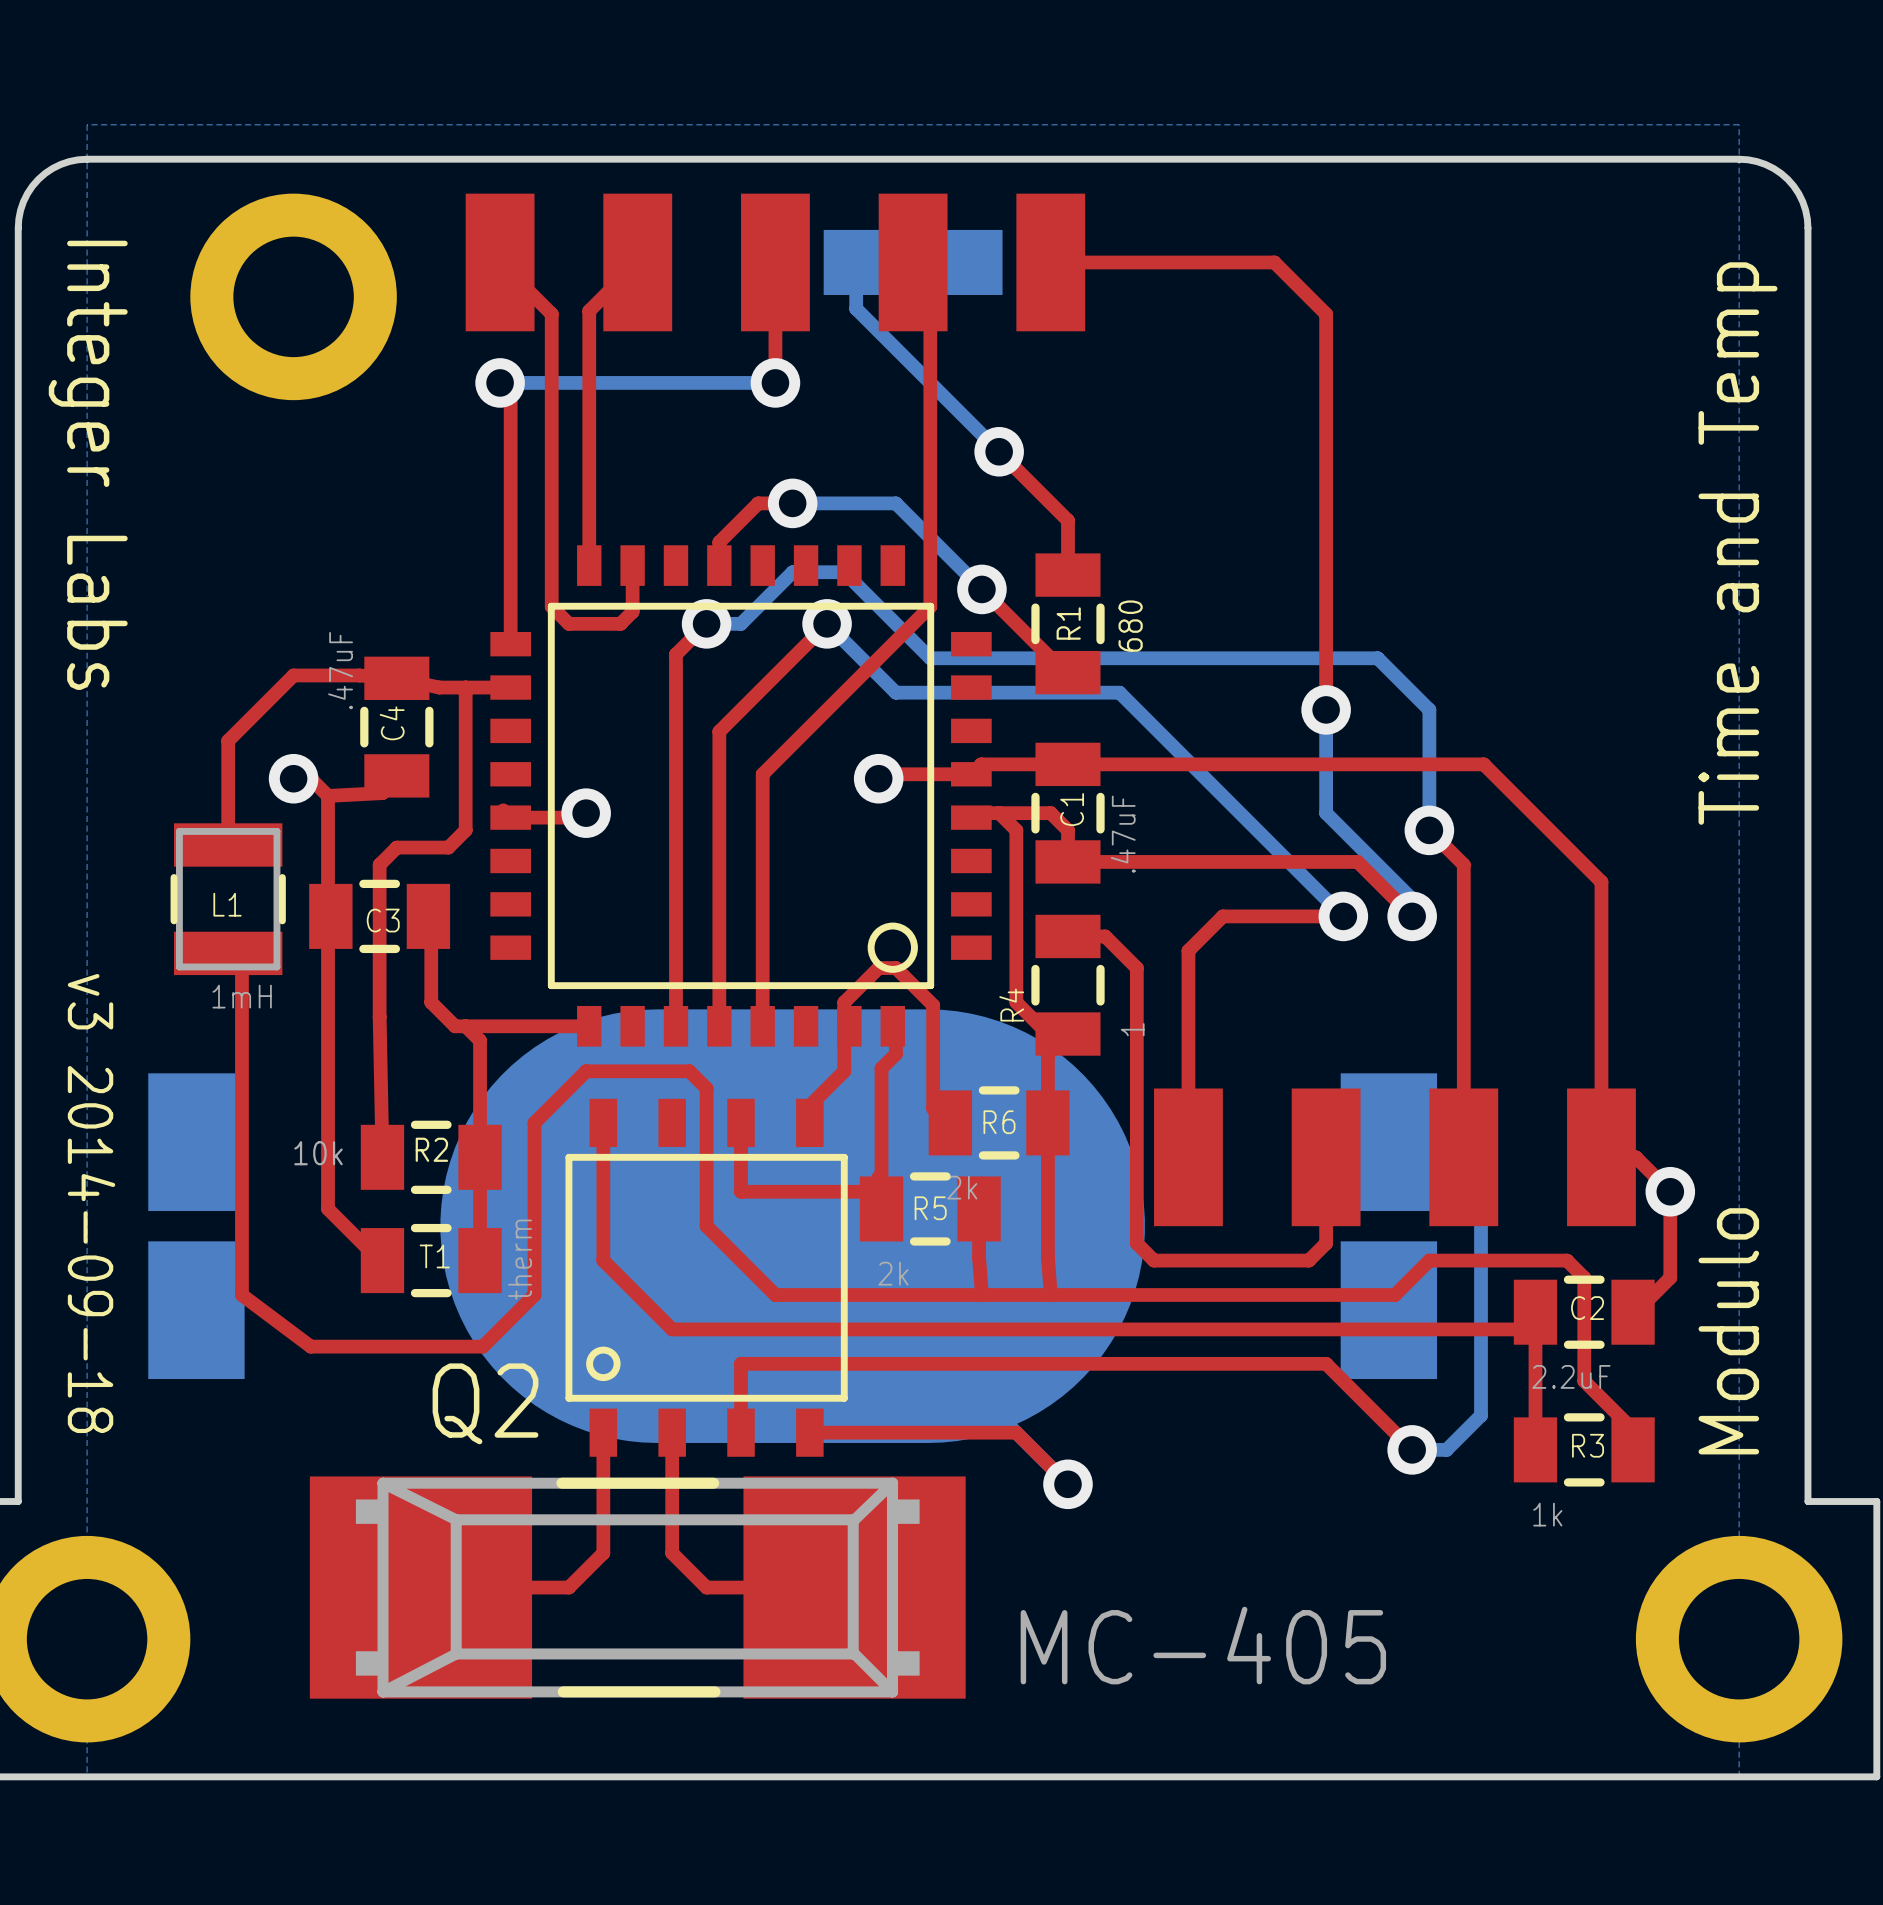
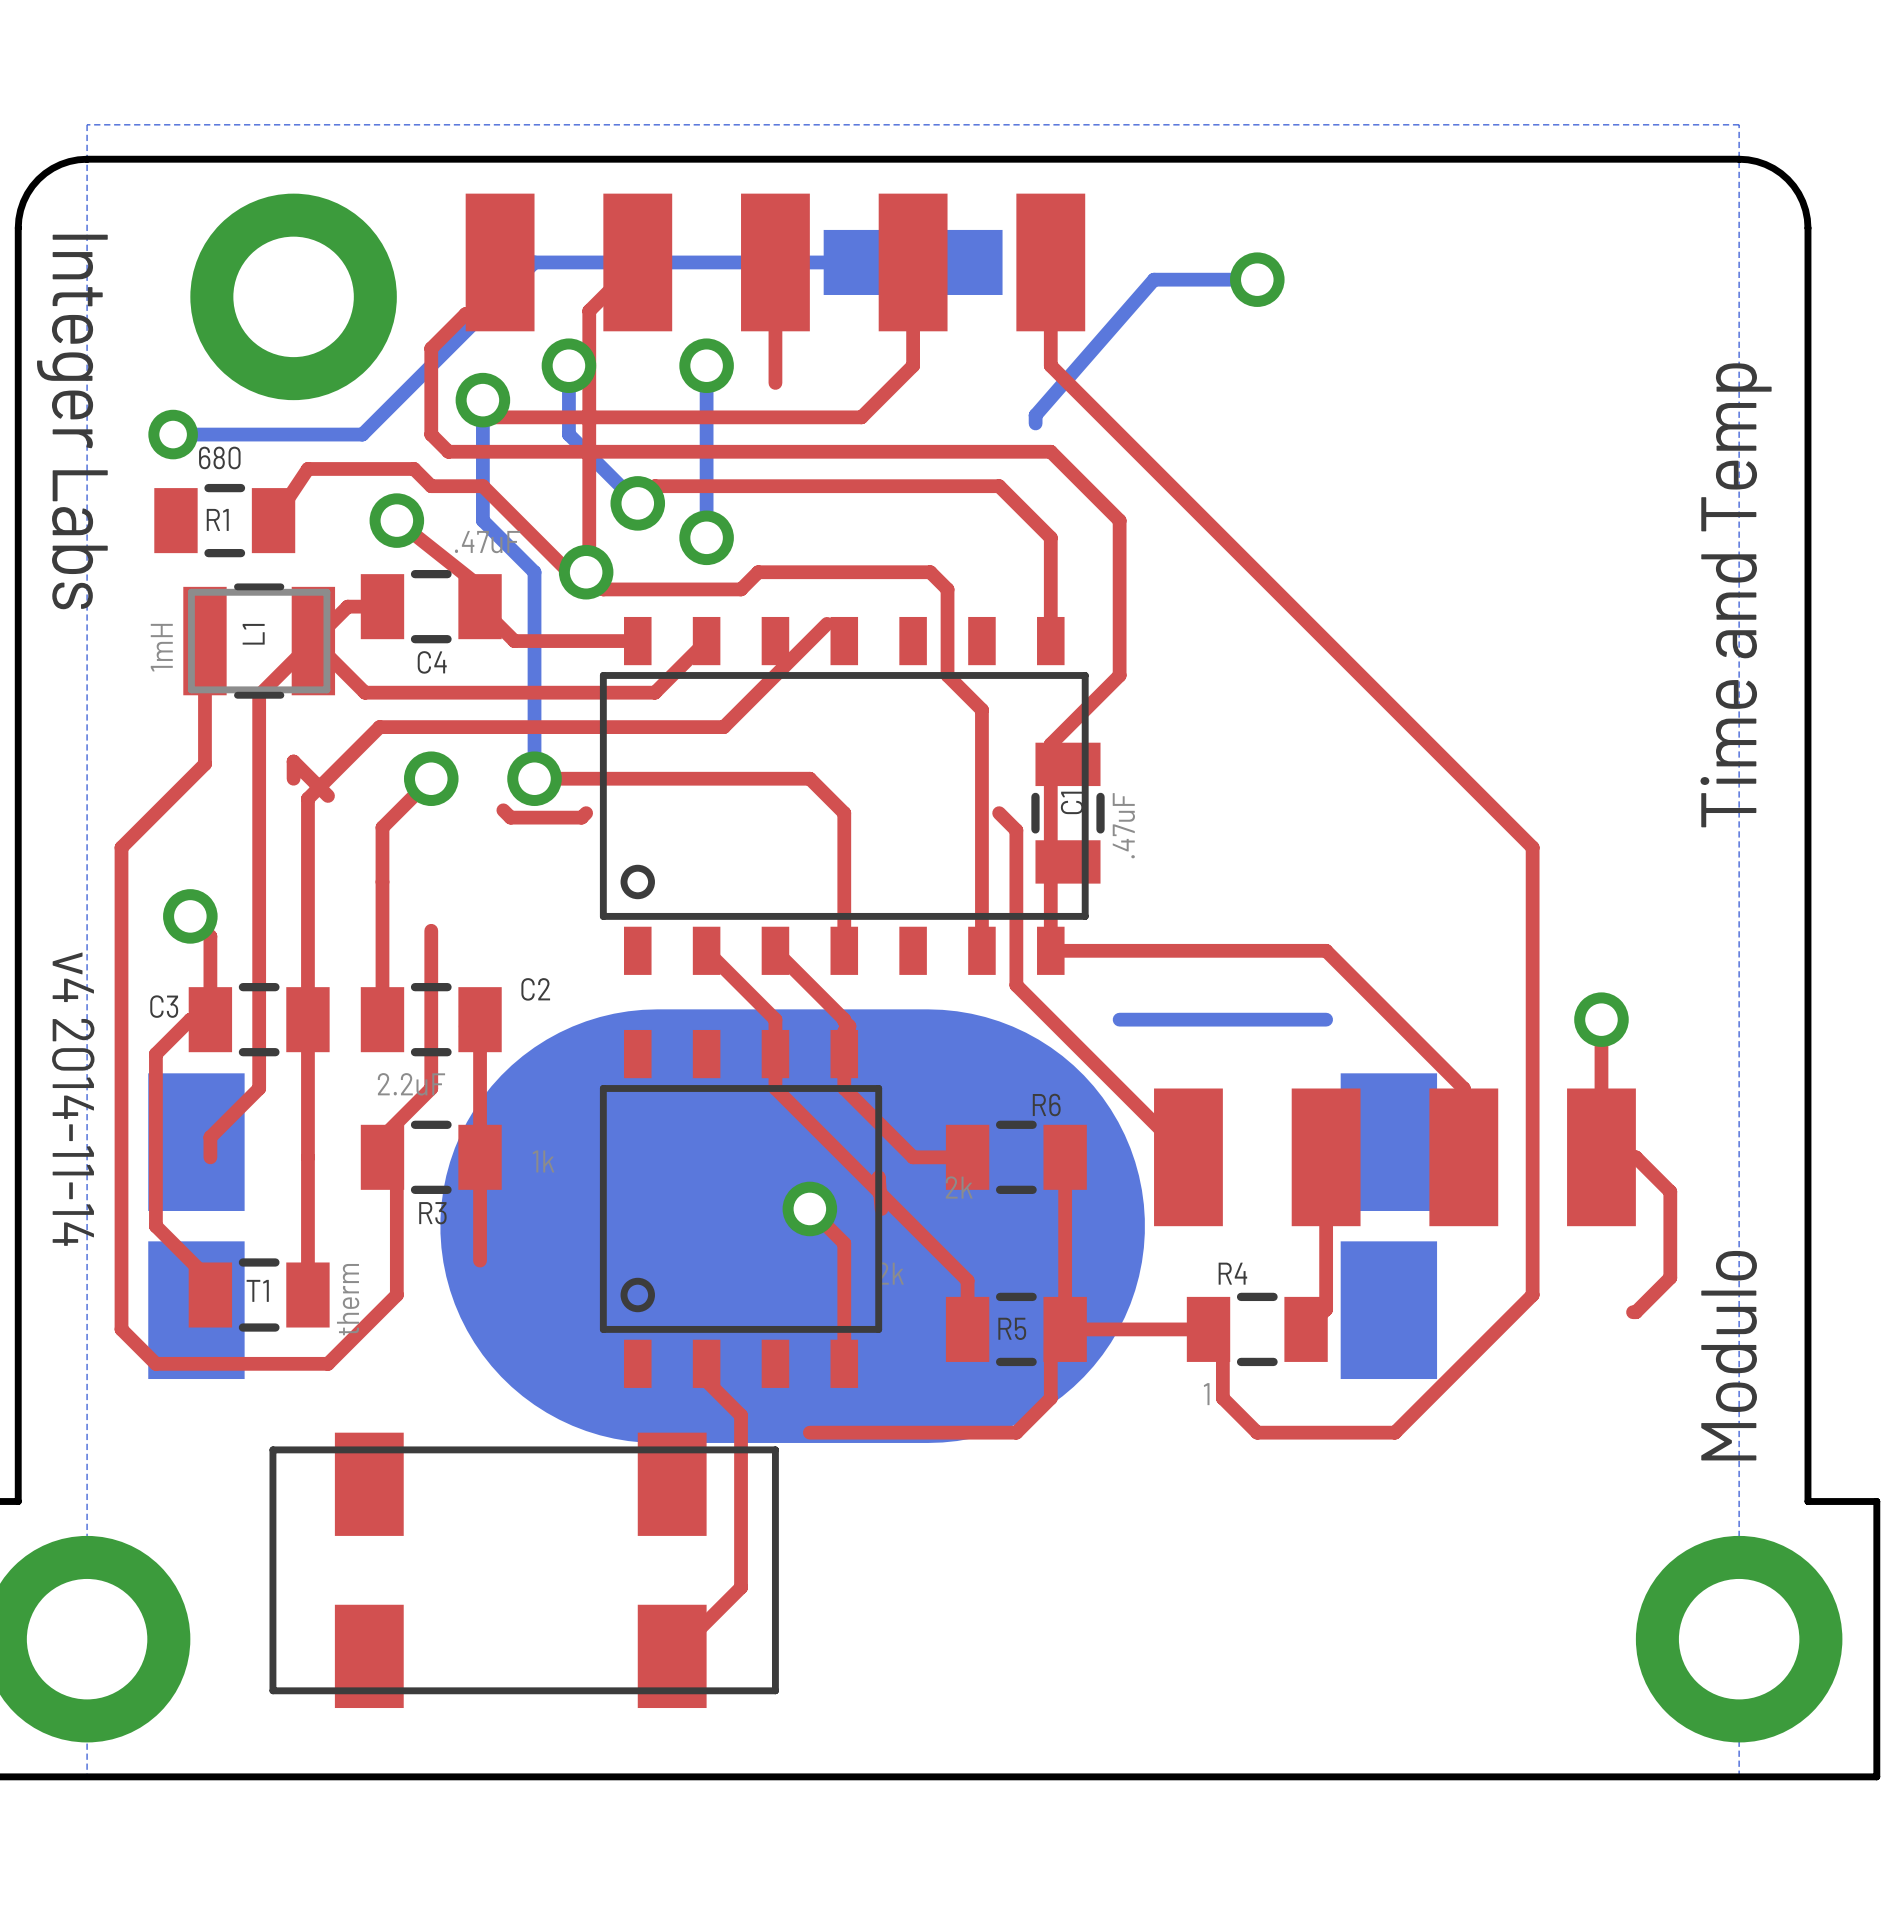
top track: (500, 262) (551, 314) (551, 606) (568, 623) (620, 623) (632, 611) (632, 565) -> (500, 262) (500, 296) (482, 314) (465, 314) (431, 348) (431, 434) (448, 451) (1050, 451) (1119, 520) (1119, 675) (1050, 744) (1050, 950) (1326, 950) (1463, 1088)
bottom track: (856, 262) (856, 308) (999, 451) -> (856, 262) (534, 262) (362, 434) (173, 434)
top track: (913, 262) (930, 279) (930, 606) (762, 774) (762, 1026) -> (913, 262) (913, 365) (861, 417) (482, 417) (482, 400)
top track: (1050, 262) (1274, 262) (1326, 314) (1326, 709) -> (1050, 262) (1050, 365) (1532, 847) (1532, 1295) (1394, 1432) (1257, 1432) (1222, 1398) (1222, 1343) (1208, 1329)
bottom track: none -> (1257, 279) (1154, 279) (1035, 415) (1035, 423)
via: none -> (1257, 279)
bottom track: none -> (568, 365) (568, 434) (637, 503)
via: none -> (568, 365)
bottom track: none -> (706, 365) (706, 537)
via: none -> (706, 365)
top track: (500, 382) (510, 393) (510, 644) -> none
bottom track: (500, 382) (775, 382) -> none
via position: (500, 382) -> (482, 400)
via: (775, 382) -> none
bottom track: none -> (482, 400) (482, 520) (534, 572) (534, 778)
via: none -> (173, 434)
top track: (999, 451) (1067, 520) (1067, 575) -> none
via: (999, 451) -> none
text position: Integer Labs (88, 465) -> Integer Labs (72, 421)
top track: none -> (637, 503) (654, 486) (999, 486) (1050, 537) (1050, 641)
via: none -> (637, 503)
top track: (792, 503) (758, 503) (719, 542) (719, 565) -> none
bottom track: (792, 503) (895, 503) (981, 589) -> none
via: (792, 503) -> none
top track: none -> (273, 520) (307, 468) (414, 468) (431, 486) (482, 486) (568, 572) (586, 572) (603, 589) (741, 589) (758, 572) (930, 572) (947, 589) (947, 675) (981, 709) (981, 950)
top track: none -> (396, 520) (480, 586) (480, 606) (514, 641) (637, 641)
via: none -> (396, 520)
via: none -> (706, 537)
via: none -> (586, 572)
top track: (981, 589) (1065, 672) (1067, 672) -> none
via: (981, 589) -> none
top track: none -> (382, 606) (347, 606) (259, 695) (259, 1088) (210, 1137) (210, 1157)
top track: (706, 623) (675, 654) (675, 1026) -> none
bottom track: (706, 623) (741, 623) (792, 572) (844, 572) (930, 658) (1377, 658) (1429, 709) (1429, 830) -> none
via: (706, 623) -> none
bottom track: (827, 623) (895, 692) (1119, 692) (1343, 916) -> none
via: (827, 623) -> none
R1 rotation: 0° (1067, 623) -> 90° clockwise (224, 520)
R1 position: (1067, 623) -> (224, 520)
top track: none -> (313, 641) (365, 692) (654, 692) (706, 641)
top track: (396, 678) (439, 687) (510, 687) -> none
top track: (396, 678) (359, 675) (293, 675) (228, 740) (228, 844) -> none
top track: (465, 687) (465, 830) (448, 847) (396, 847) (379, 864) (382, 1157) -> none
bottom track: (1326, 709) (1326, 813) (1412, 899) (1412, 916) -> none
via: (1326, 709) -> none
C4 rotation: 0° (396, 727) -> 90° clockwise (431, 606)
C4 position: (396, 727) -> (431, 606)
top track: (723, 727) (719, 731) (719, 1026) -> (723, 727) (379, 727) (307, 798) (307, 1295)
top track: (396, 775) (382, 793) (328, 795) (328, 913) (330, 916) (325, 922) -> none
via: (293, 778) -> none
top track: none -> (431, 778) (382, 827) (382, 1019)
via: none -> (431, 778)
top track: none -> (534, 778) (809, 778) (844, 813) (844, 950)
via: none -> (534, 778)
top track: (878, 778) (883, 774) (971, 774) (981, 764) (1483, 764) (1601, 881) (1601, 1019) -> none
via: (878, 778) -> none
part: (741, 795) -> none
part: none -> (844, 795)
via: (586, 813) -> none
top track: (971, 817) (975, 813) (1050, 813) (1067, 830) (1067, 861) (1357, 861) (1412, 916) -> none
top track: (1429, 830) (1463, 864) (1463, 1088) -> none
via: (1429, 830) -> none
L1 rotation: 0° (228, 899) -> 90° clockwise (259, 641)
L1 position: (228, 899) -> (259, 641)
top track: none -> (190, 916) (210, 936) (210, 1019) (190, 1019) (155, 1054) (155, 1226) (210, 1280) (210, 1295)
via: none -> (190, 916)
C3 position: (379, 916) -> (259, 1019)
top track: (1343, 916) (1222, 916) (1188, 950) (1188, 1157) -> none
via: (1343, 916) -> none
via: (1412, 916) -> none
top track: (328, 919) (328, 1208) (379, 1260) (382, 1260) -> none
C3 name position: C3 (383, 920) -> C3 (164, 1006)
top track: (1067, 936) (1105, 936) (1136, 968) (1136, 1243) (1154, 1260) (1308, 1260) (1326, 1243) -> (1306, 1329) (1326, 1309) (1326, 1243)
top track: none -> (706, 950) (775, 1019) (775, 1088) (967, 1280) (967, 1329)
top track: (228, 953) (241, 967) (241, 1295) (310, 1346) (482, 1346) (534, 1295) (534, 1122) (586, 1071) (689, 1071) (706, 1088) (706, 1226) (775, 1295) (1394, 1295) (1429, 1260) (1567, 1260) (1584, 1277) (1584, 1381) (1633, 1429) (1633, 1449) -> none
top track: (1016, 985) (1016, 1002) (1047, 1034) (1067, 1034) (1047, 1054) (1047, 1257) (1050, 1295) -> (1016, 985) (1188, 1157)
R4 rotation: 0° (1067, 985) -> 90° clockwise (1257, 1329)
R4 position: (1067, 985) -> (1257, 1329)
top track: (431, 1002) (455, 1026) (589, 1026) -> (431, 1002) (431, 1088) (382, 1137) (382, 1157) (396, 1171) (396, 1295) (328, 1363) (155, 1363) (121, 1329) (121, 847) (204, 764) (204, 641)
top track: (844, 1019) (844, 1002) (878, 968) (895, 968) (933, 1005) (933, 1108) (947, 1122) (950, 1122) -> (844, 1019) (775, 950)
bottom track: none -> (1119, 1019) (1326, 1019)
via: none -> (1601, 1019)
top track: (892, 1026) (895, 1029) (895, 1054) (881, 1068) (881, 1208) (864, 1191) (741, 1191) (741, 1122) -> none
top track: (844, 1071) (809, 1105) (809, 1122) -> (844, 1071) (844, 1088) (913, 1157) (967, 1157)
top track: (603, 1122) (603, 1260) (672, 1329) (1065, 1329) -> none
R6 position: (999, 1122) -> (1016, 1157)
R6 name position: R6 (999, 1122) -> R6 (1046, 1105)
bottom track: (1388, 1142) (1465, 1142) (1481, 1174) (1481, 1415) (1446, 1449) (1412, 1449) -> none
R2 name: R2 (431, 1149) -> R3 (432, 1213)
R2 value: 10k (318, 1153) -> 1k (543, 1161)
via: (1670, 1191) -> none
text: v3 2014-09-18 (91, 1203) -> v4 2014-11-14 (73, 1099)
top track: none -> (809, 1208) (844, 1243) (844, 1363)
via: none -> (809, 1208)
R5 position: (930, 1208) -> (1016, 1329)
top track: (979, 1208) (979, 1257) (981, 1295) -> none
T1 position: (431, 1260) -> (259, 1295)
part position: (706, 1277) -> (741, 1208)
C2 name position: C2 (1587, 1308) -> C2 (535, 989)
top track: (1535, 1312) (1535, 1449) -> none
C2 position: (1584, 1312) -> (431, 1019)
top track: (1208, 1329) (1535, 1329) -> none
top track: (741, 1415) (741, 1363) (1326, 1363) (1412, 1449) -> (741, 1415) (706, 1381) (706, 1363)
top track: (603, 1432) (603, 1553) (568, 1587) (420, 1587) -> none
top track: (672, 1432) (672, 1553) (706, 1587) (854, 1587) -> none
top track: none -> (741, 1432) (741, 1587) (672, 1656)
top track: (1016, 1432) (1067, 1484) -> (1016, 1432) (1050, 1398) (1050, 1343) (1065, 1329) (1065, 1157)
via: (1412, 1449) -> none
R3: 1k (1584, 1449) -> none
via: (1067, 1484) -> none
part: none -> (524, 1570)
Q2: MC-405 (637, 1587) -> none

